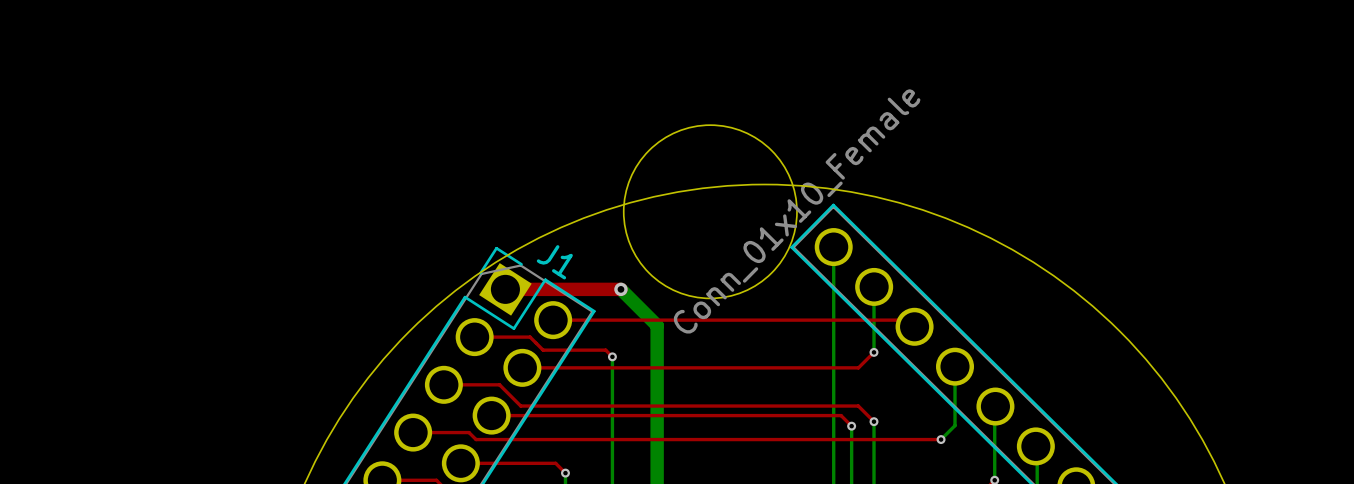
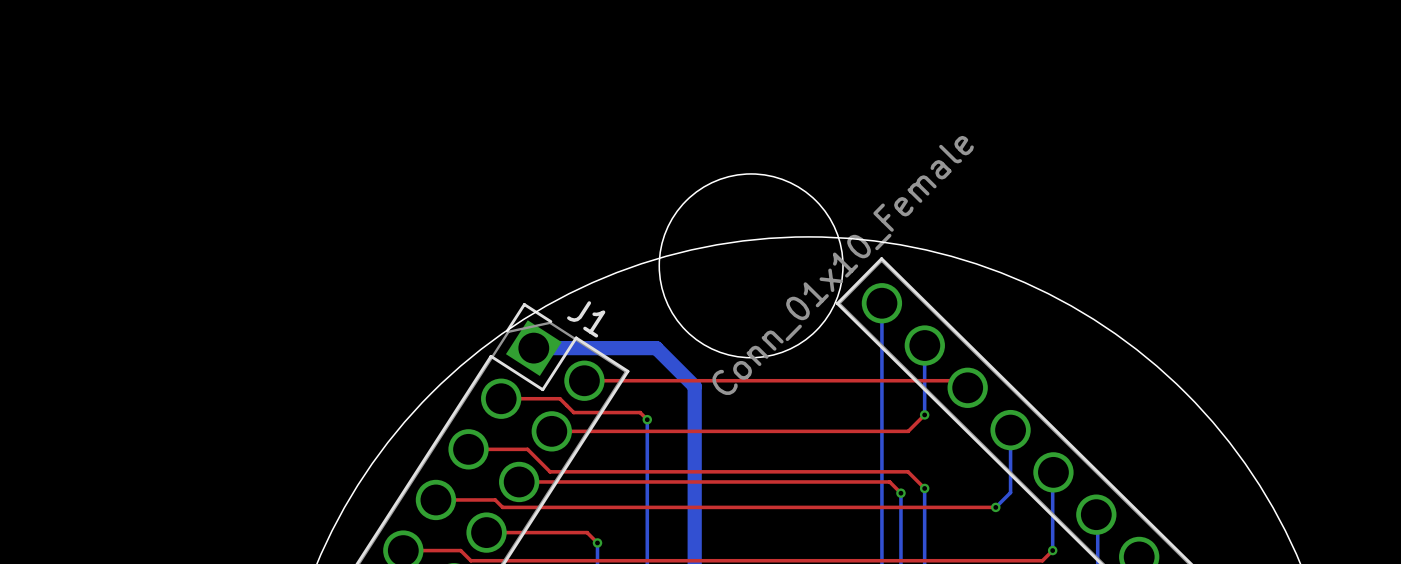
bottom track: none -> (533, 348) (656, 348)
top track: (505, 289) (620, 289) -> none
via: (620, 289) -> none

